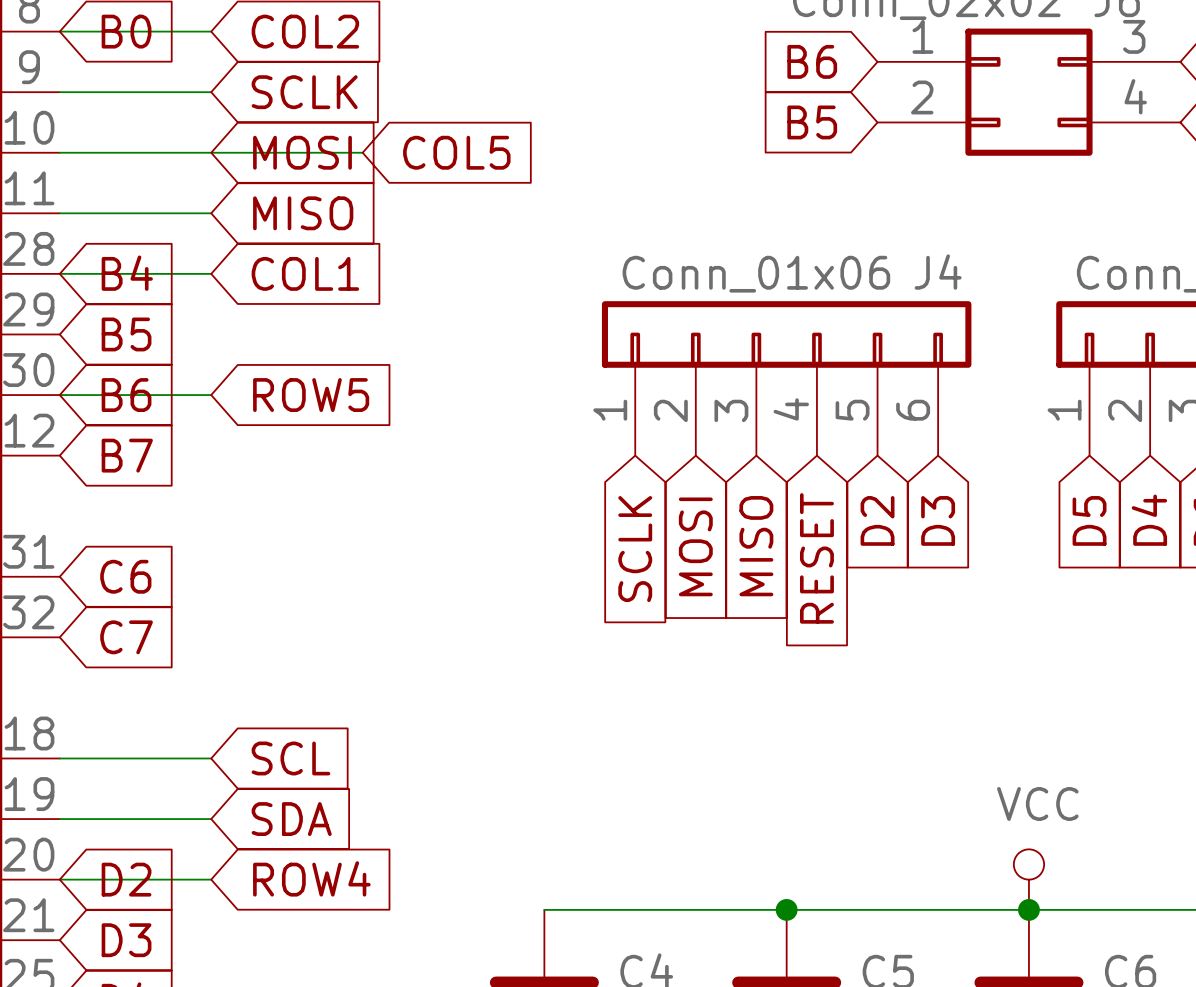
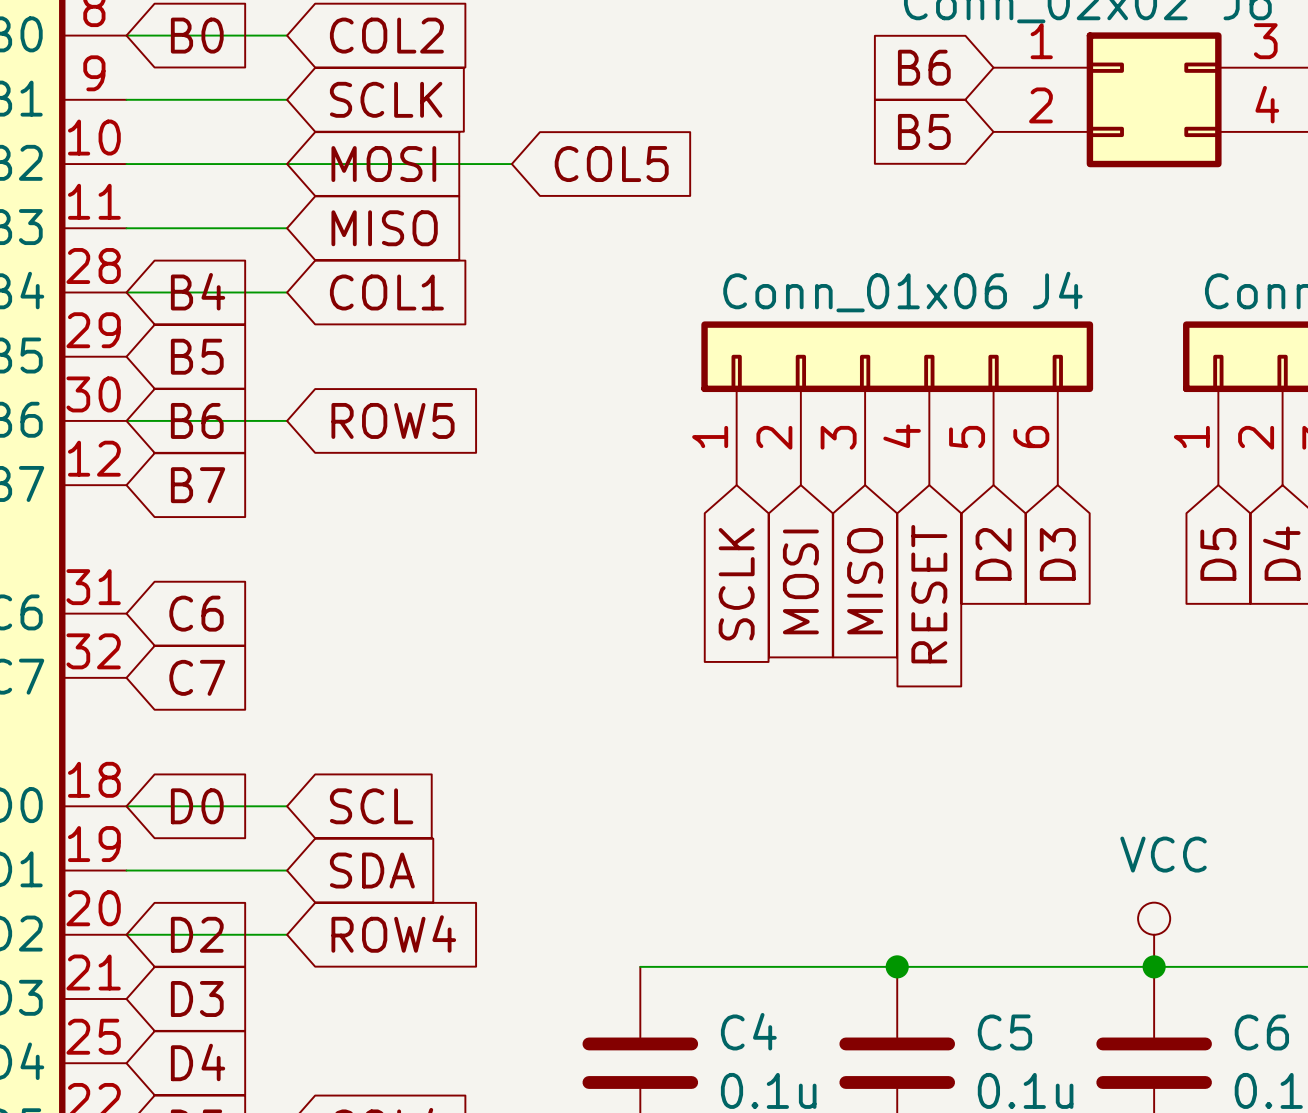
wire: none -> (447, 164) (511, 164)
global label position: COL5 (456, 152) -> COL5 (611, 164)
global label: none -> D0 (197, 806)

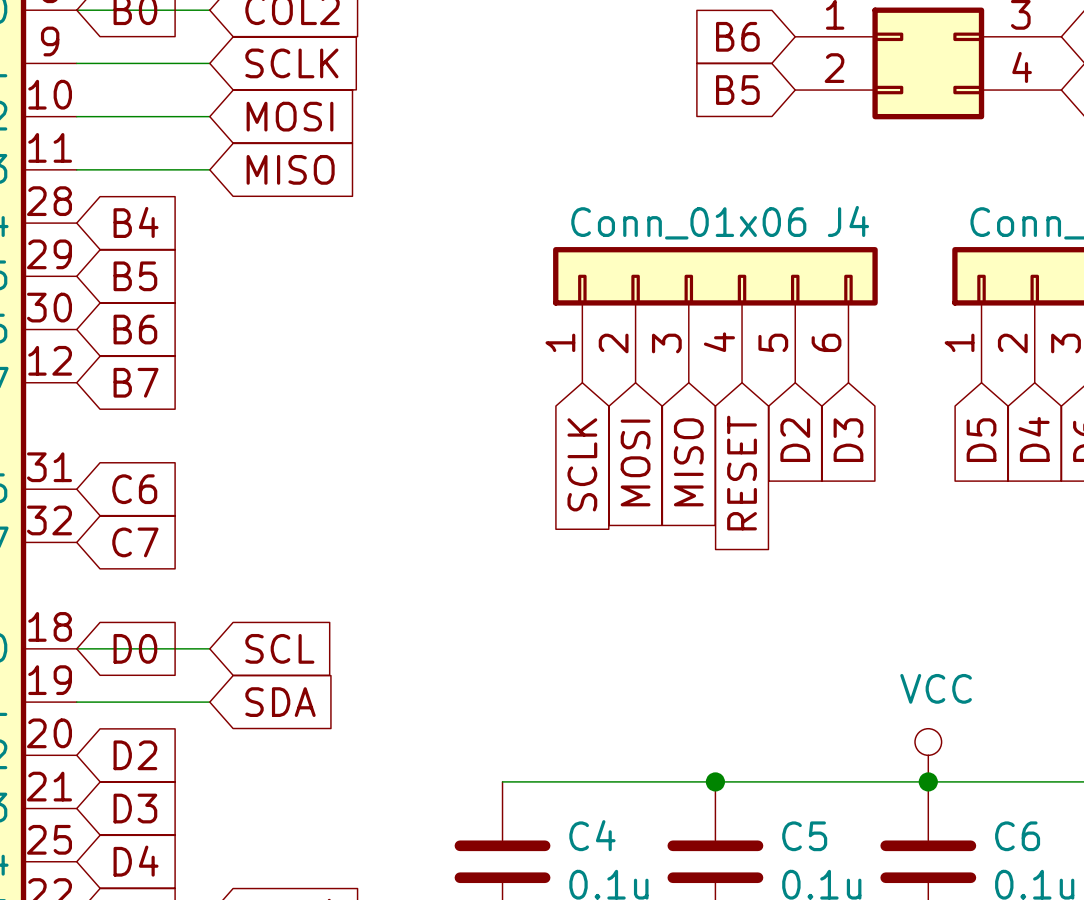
wire: (287, 164) (511, 164) -> none
global label: COL5 (611, 164) -> none
wire: (126, 292) (287, 292) -> none
global label: COL1 (386, 292) -> none
wire: (126, 420) (287, 420) -> none
global label: ROW5 (393, 420) -> none
wire: (126, 934) (287, 934) -> none
global label: ROW4 (393, 934) -> none

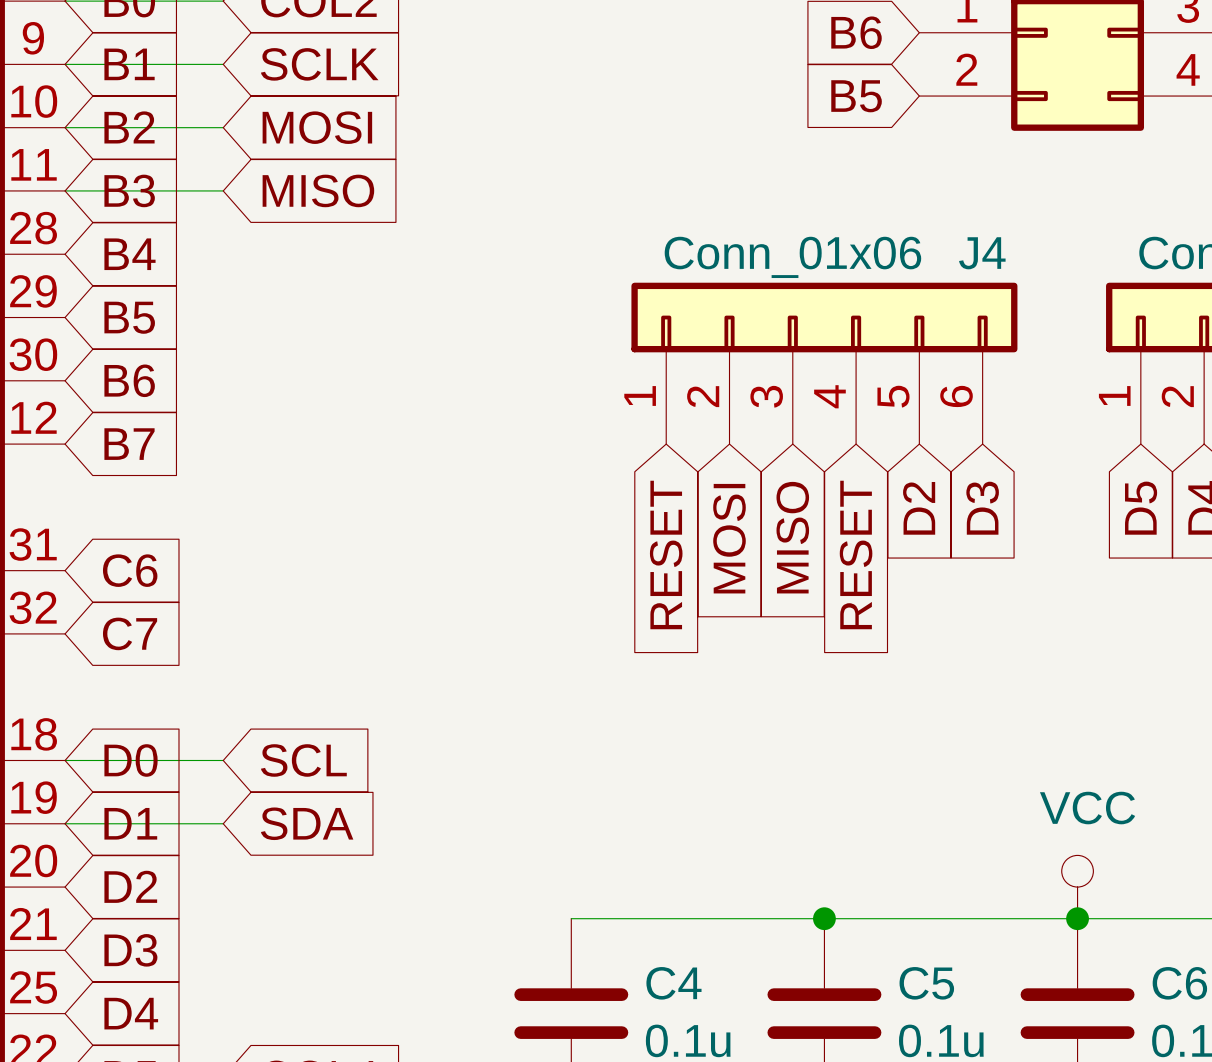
global label: none -> B1 (129, 64)
global label: none -> B2 (129, 127)
global label: none -> B3 (129, 190)
global label: SCLK (582, 464) -> RESET (666, 554)
global label: none -> D1 (130, 823)

